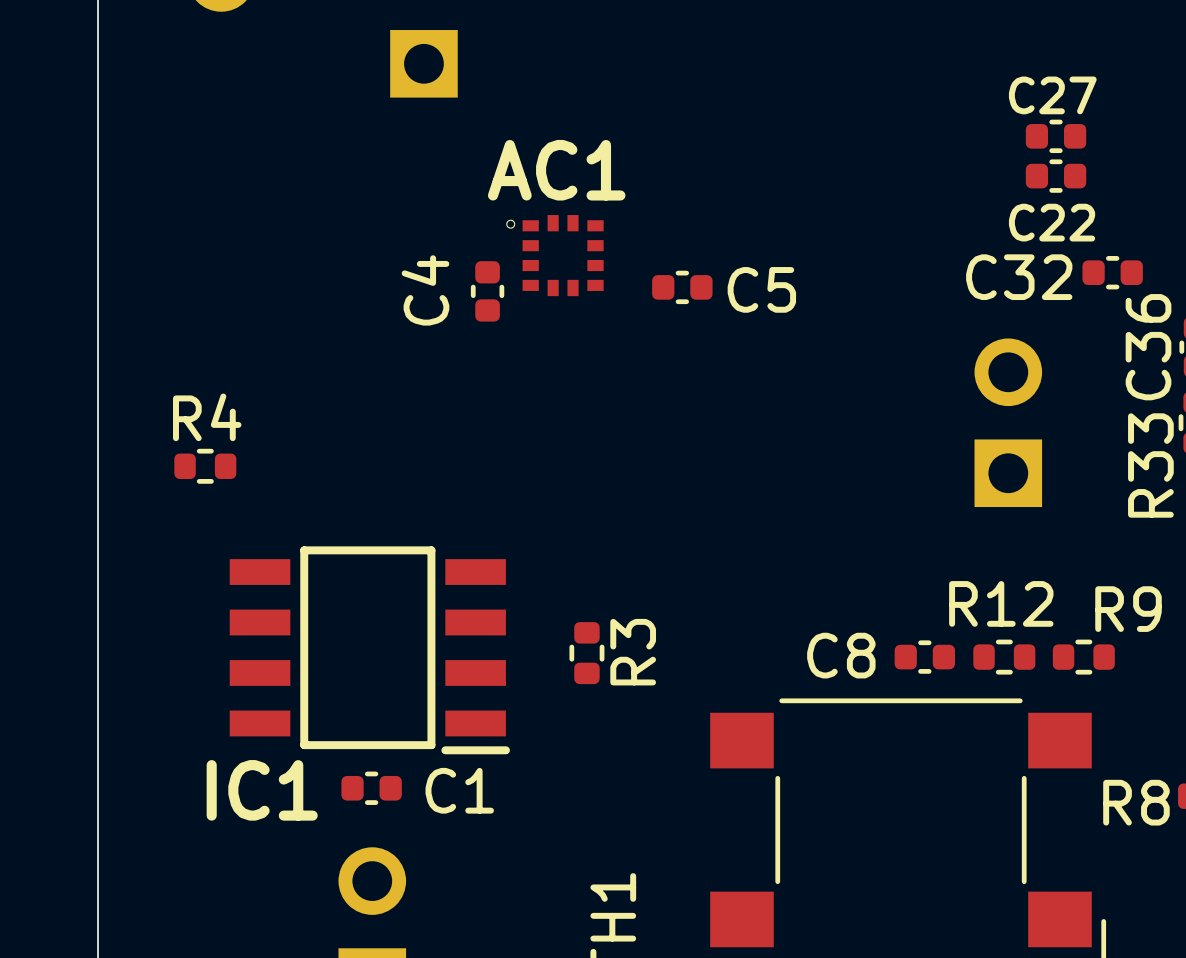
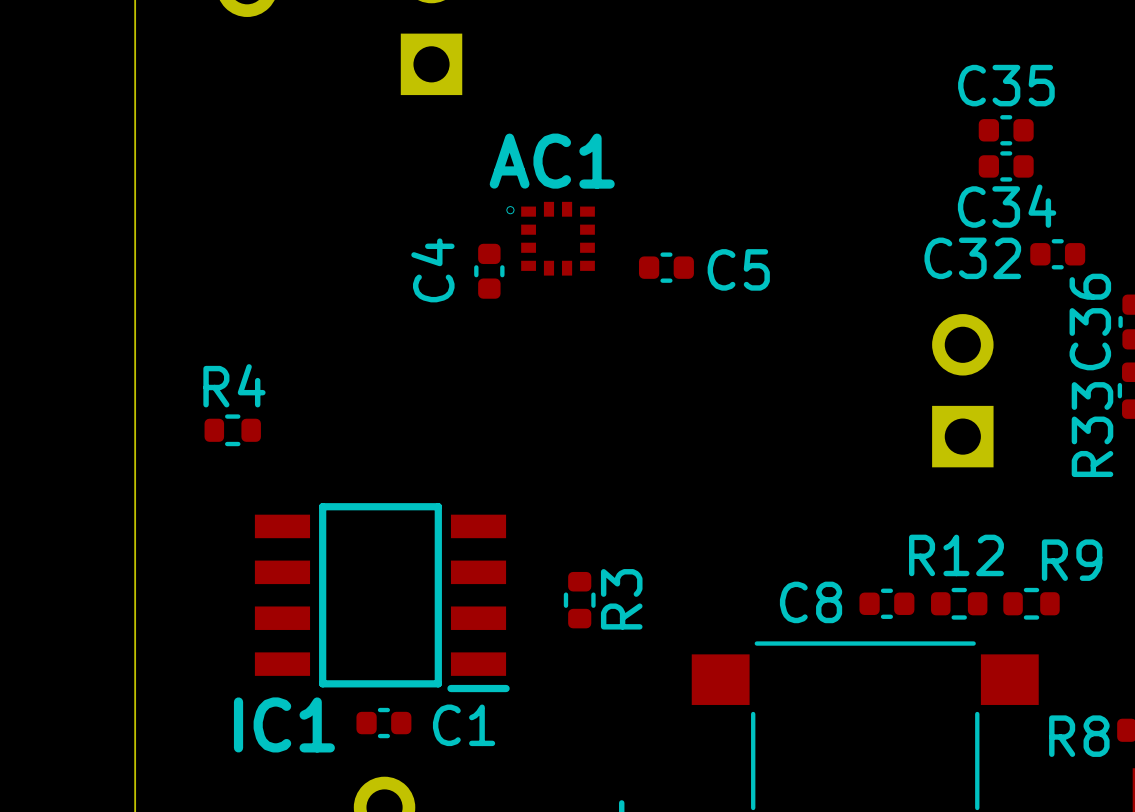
C27 name: C27 (1052, 95) -> C35 (1006, 85)
C22 name: C22 (1052, 222) -> C34 (1007, 206)

